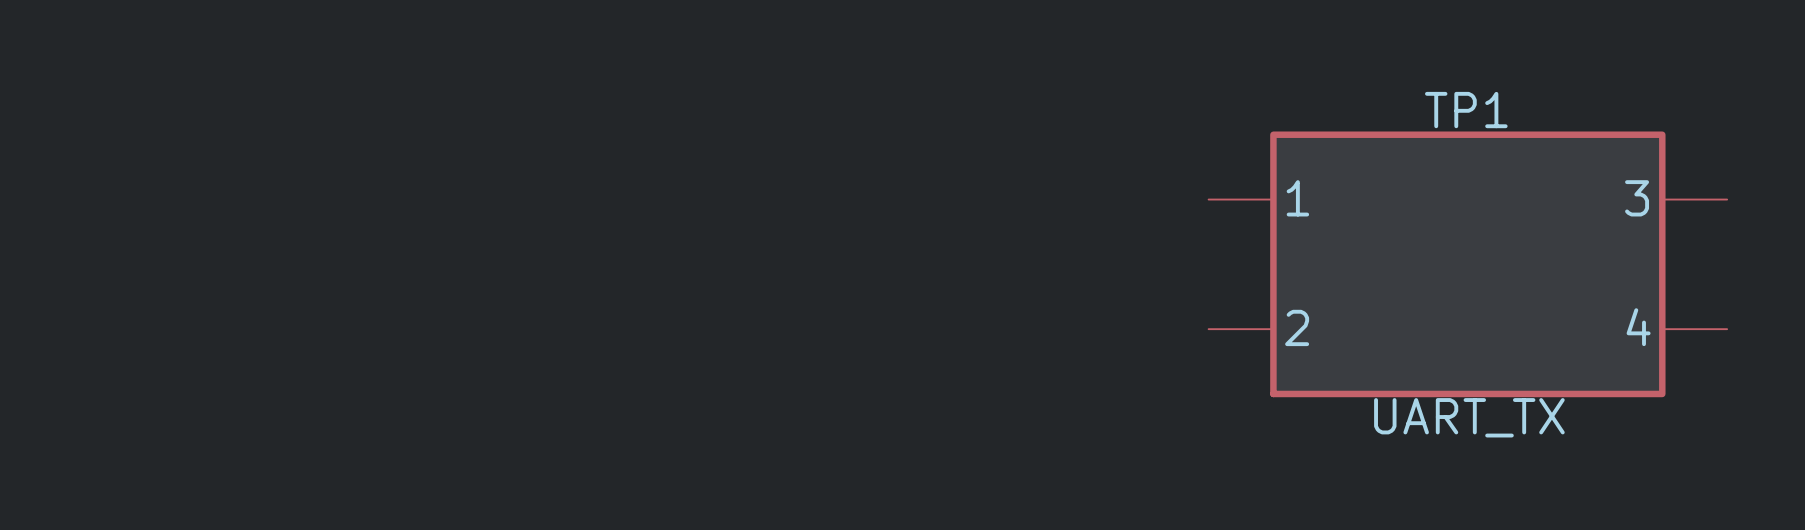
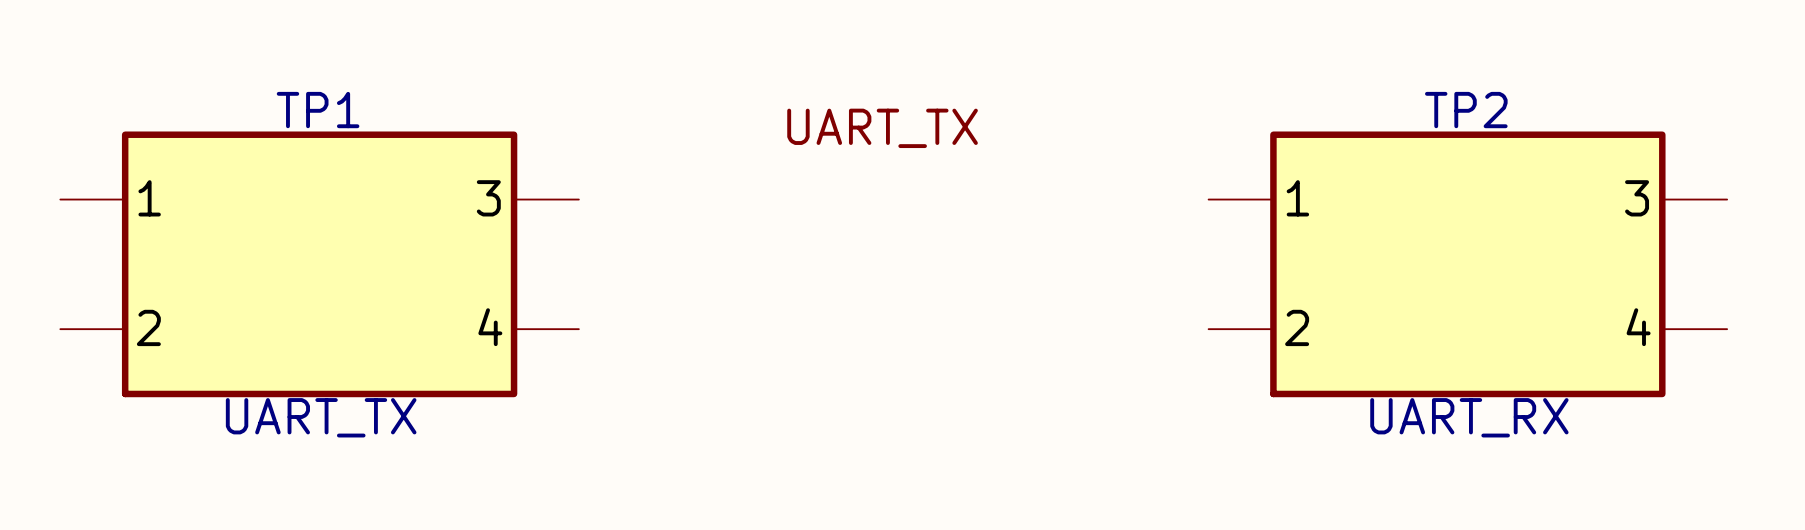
TP1 name: TP1 (1466, 110) -> TP2 (1466, 110)
label: none -> UART_TX (882, 128)
TP1: none -> UART_TX (319, 264)
TP1 value: UART_TX (1469, 417) -> UART_RX (1469, 417)

